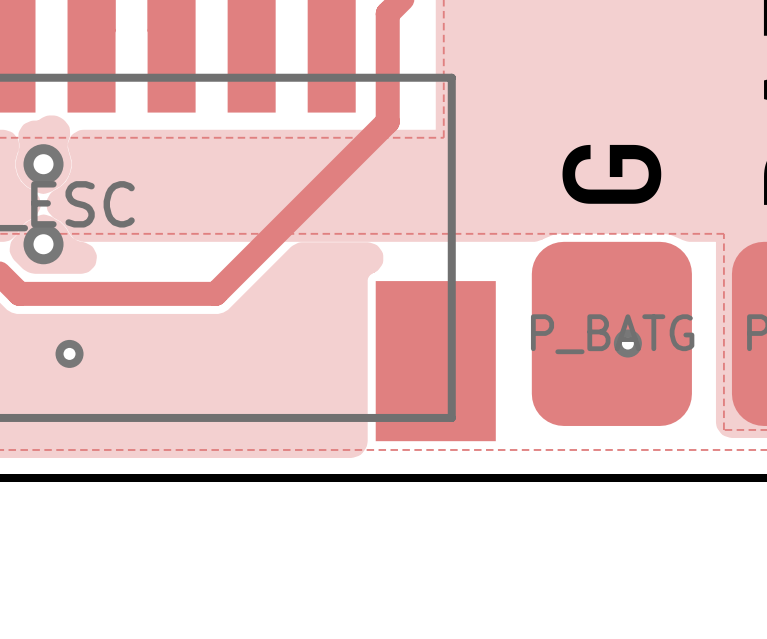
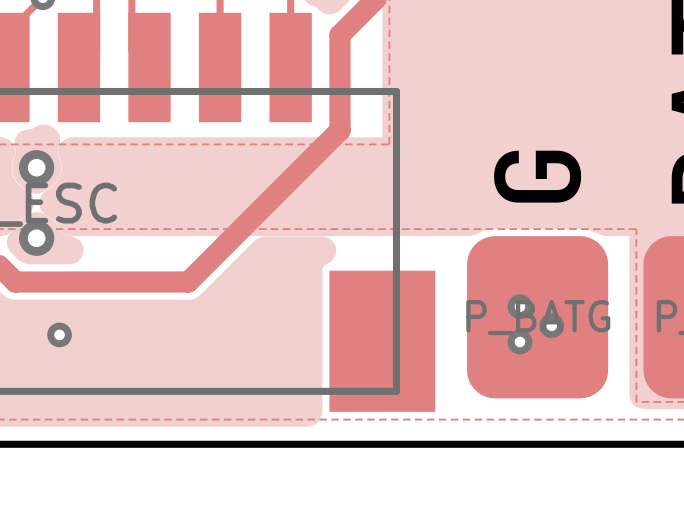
via: none -> (519, 306)
via: none -> (519, 341)

